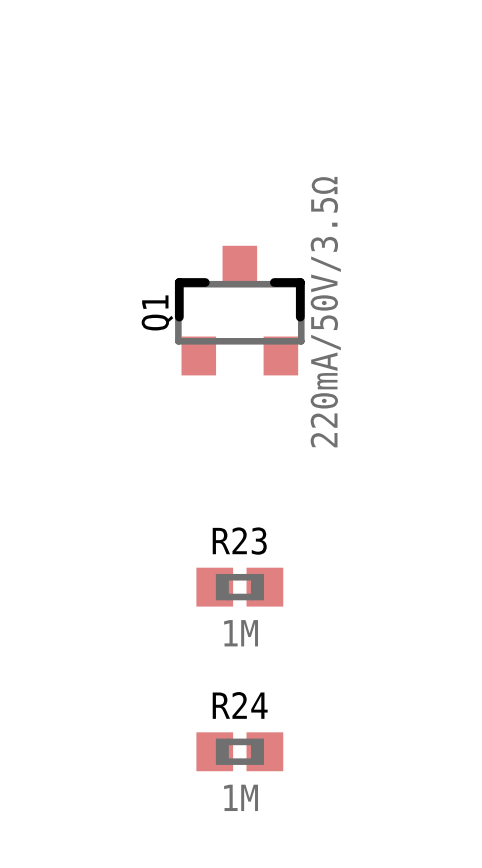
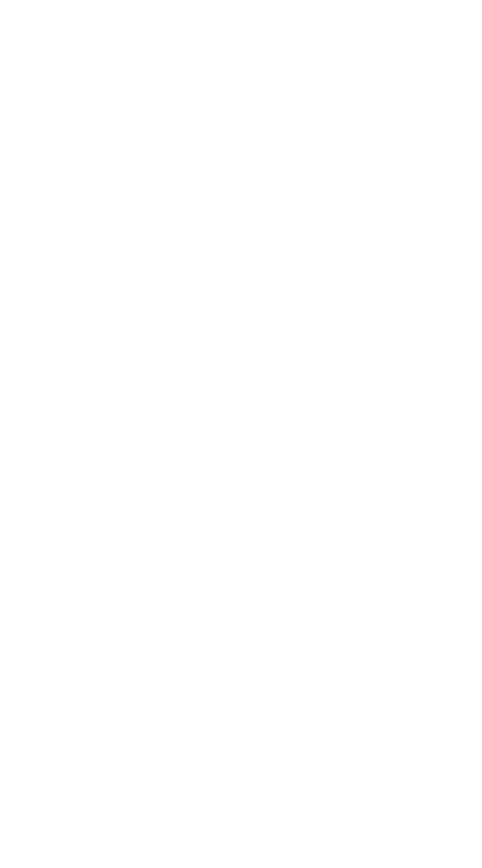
Q1: 220mA/50V/3.5Ω (239, 310) -> none
R23: 1M (239, 587) -> none
R24: 1M (239, 751) -> none

